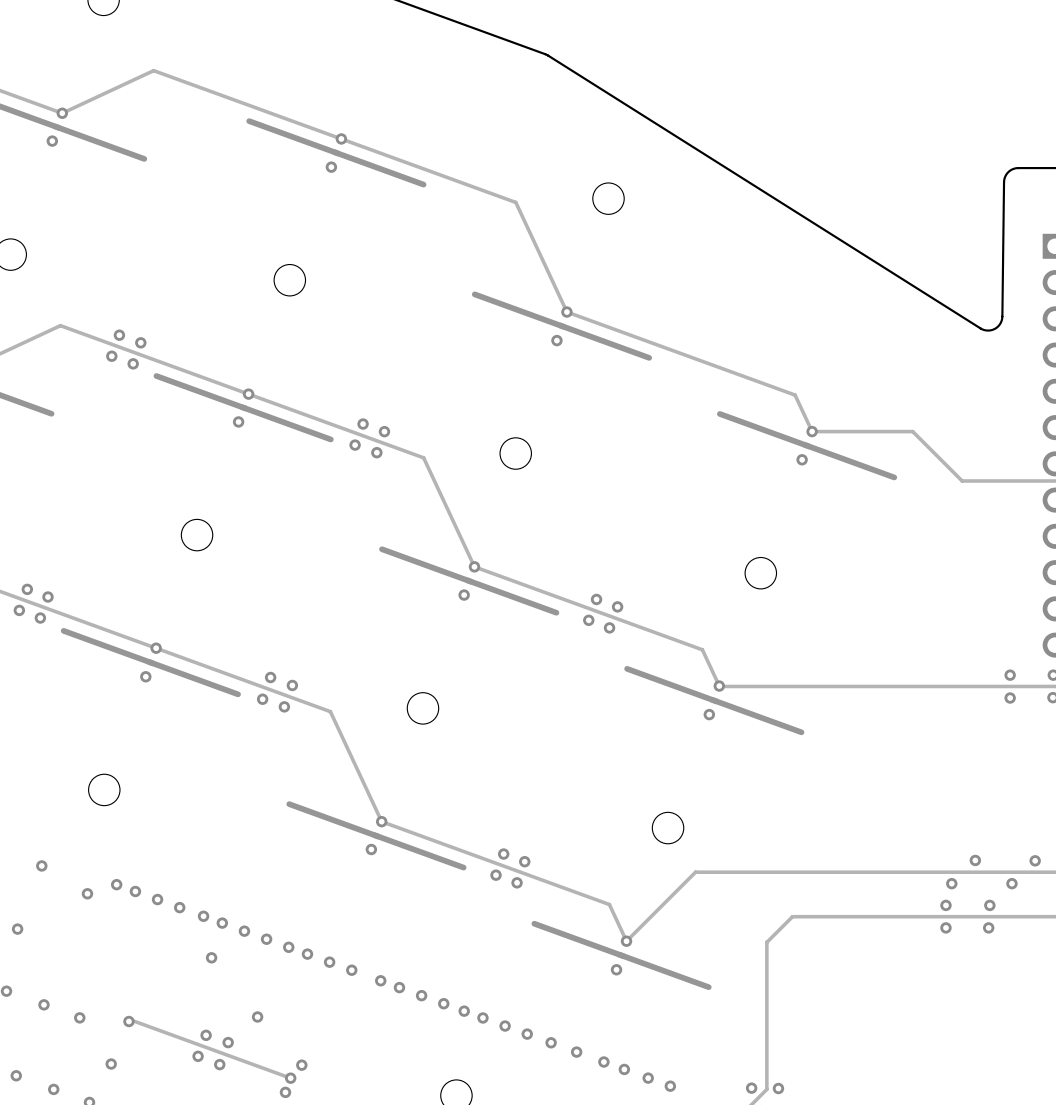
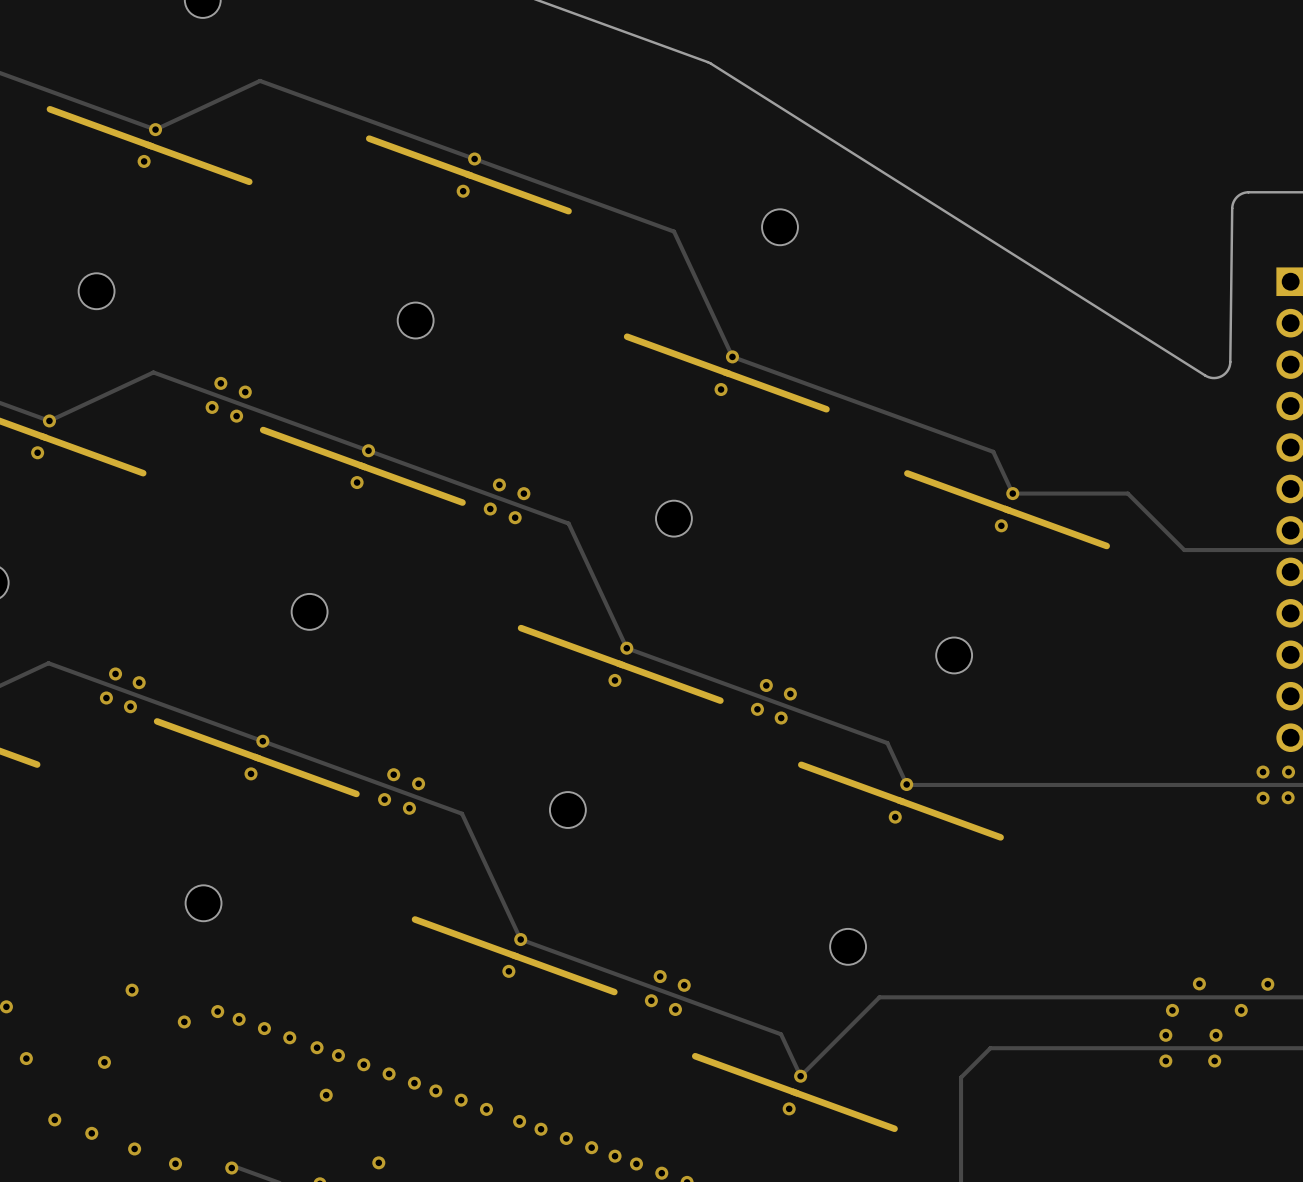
via: (1010, 675) -> none
via: none -> (1263, 772)
via: (1010, 698) -> none
via: none -> (1263, 798)

